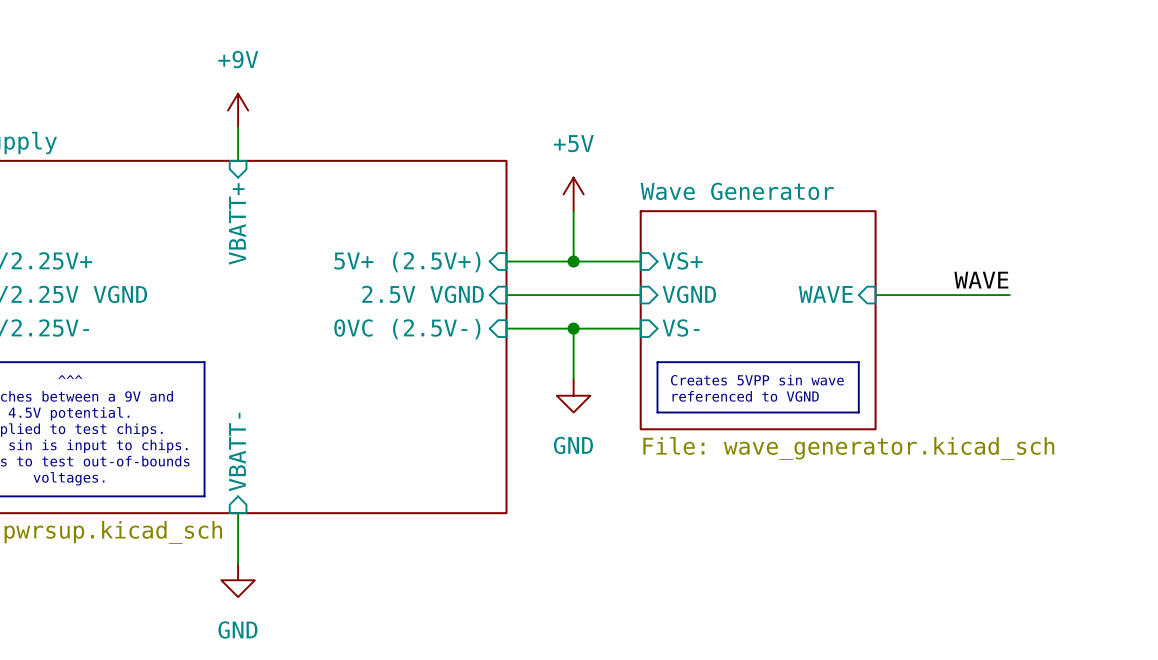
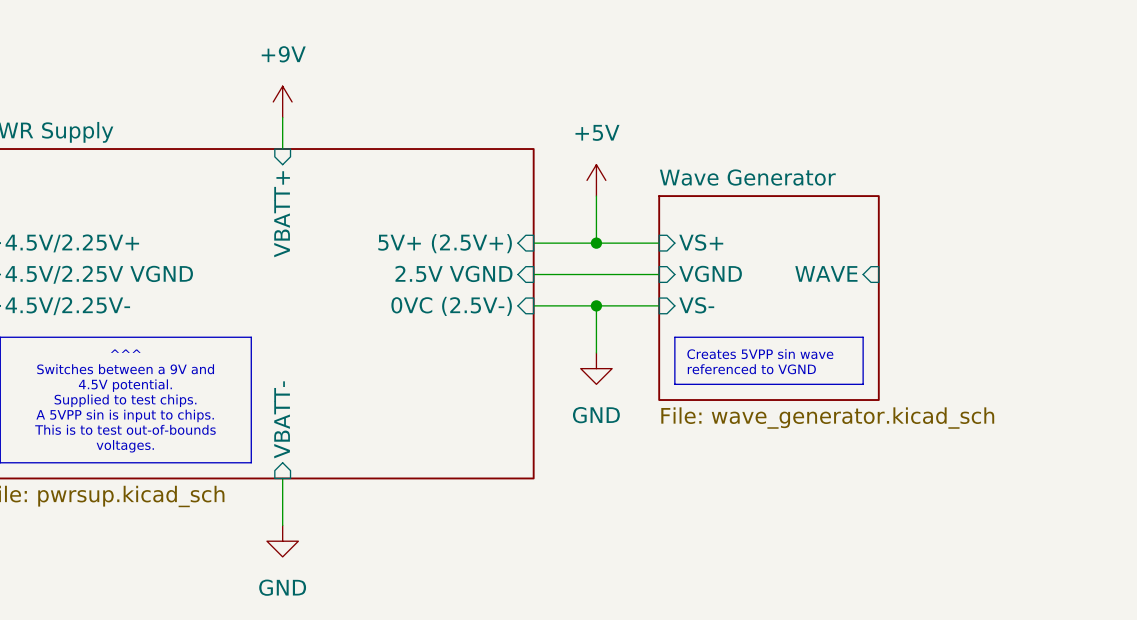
label: WAVE (981, 280) -> none
wire: (875, 295) (1009, 295) -> none

